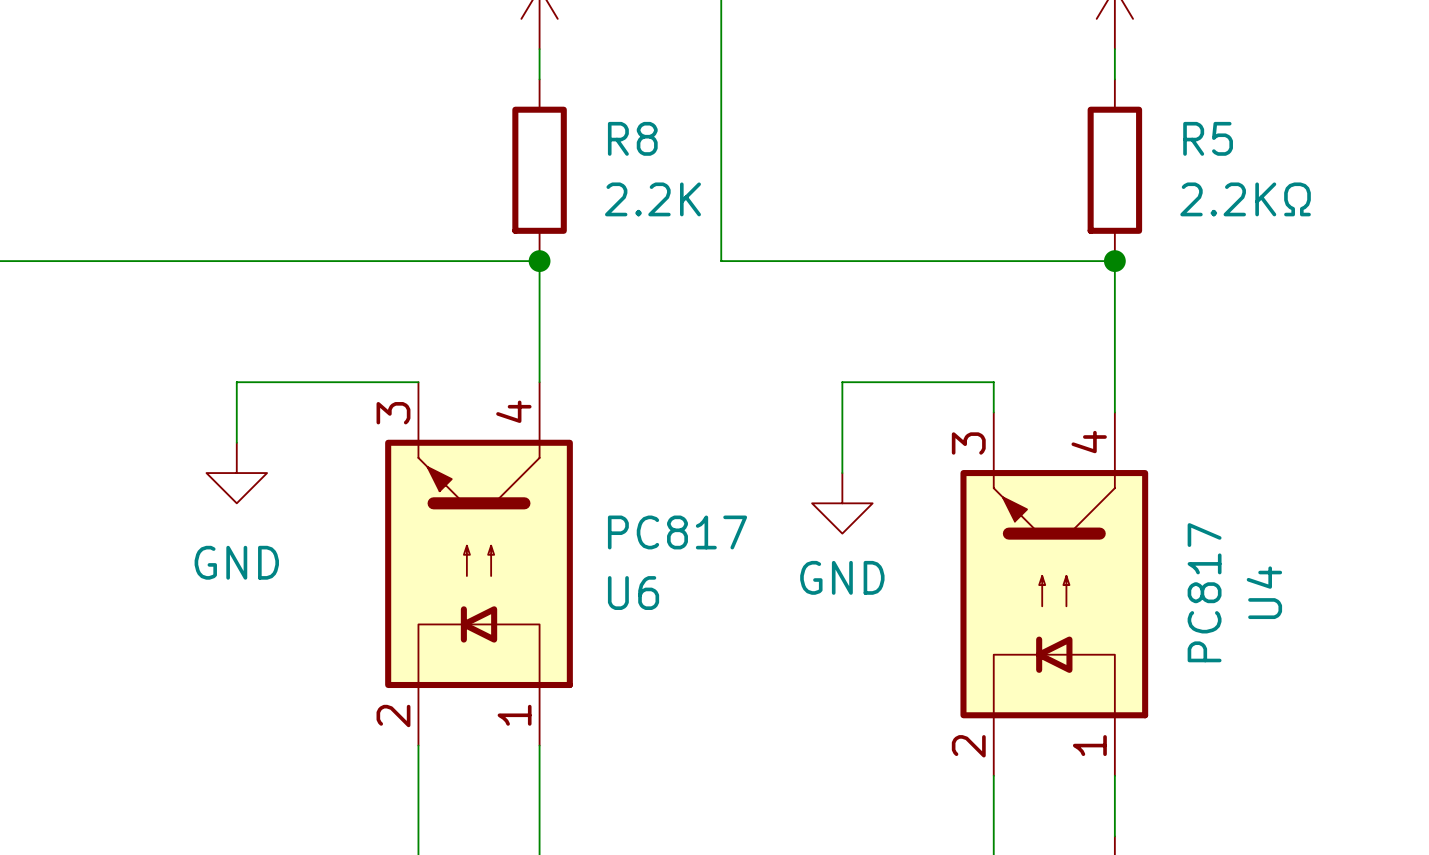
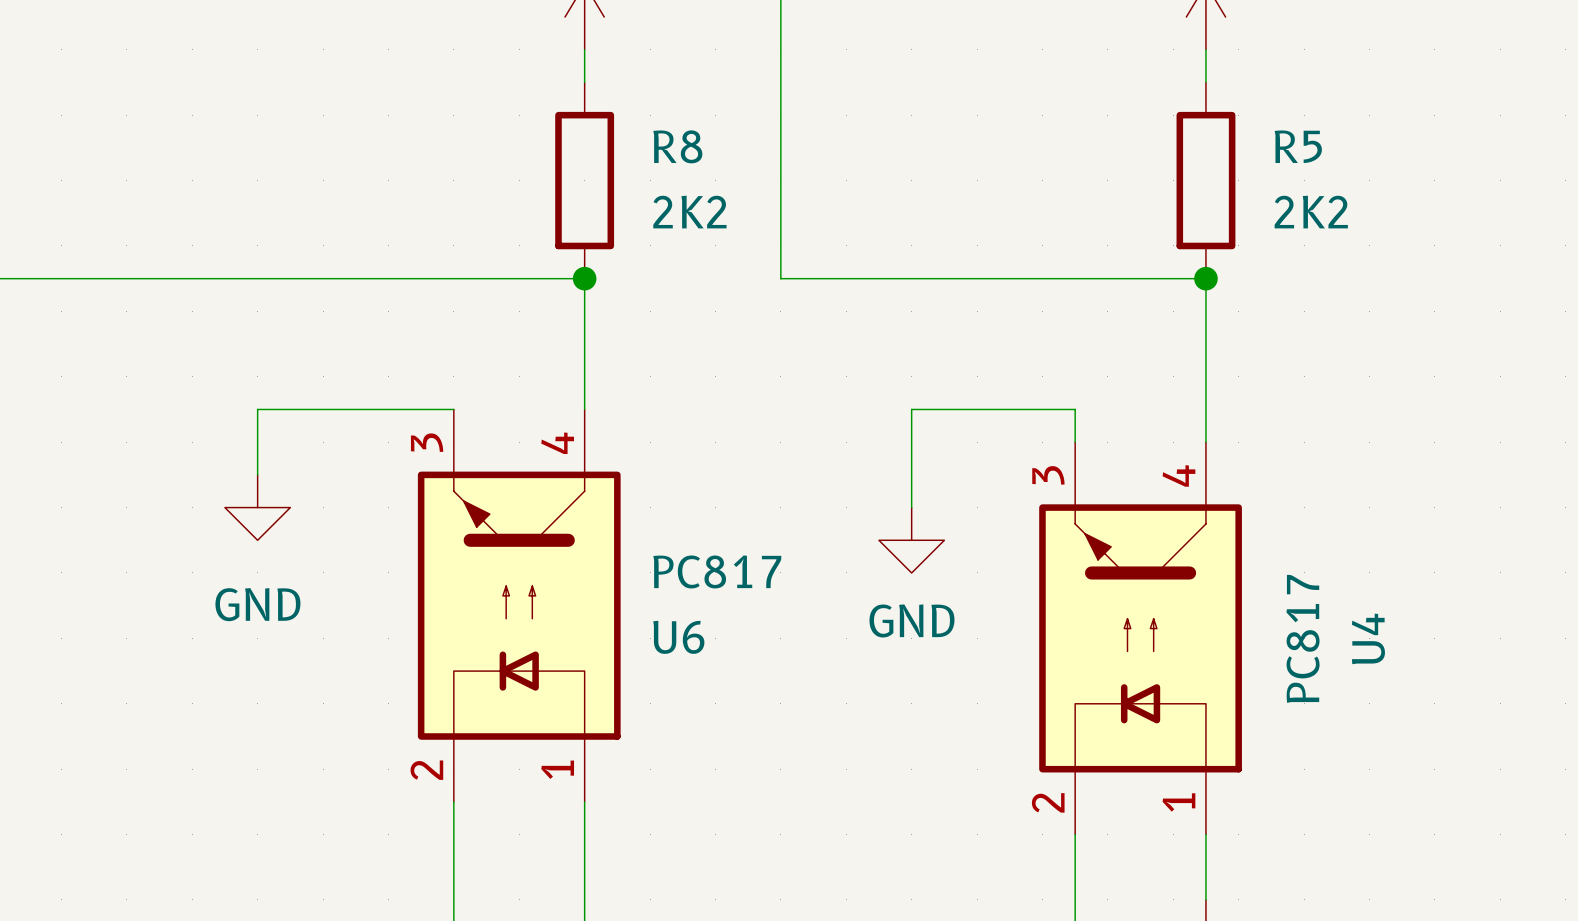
R8 value: 2.2K (652, 199) -> 2K2 (689, 212)
R5 value: 2.2KΩ (1245, 199) -> 2K2 (1311, 212)

